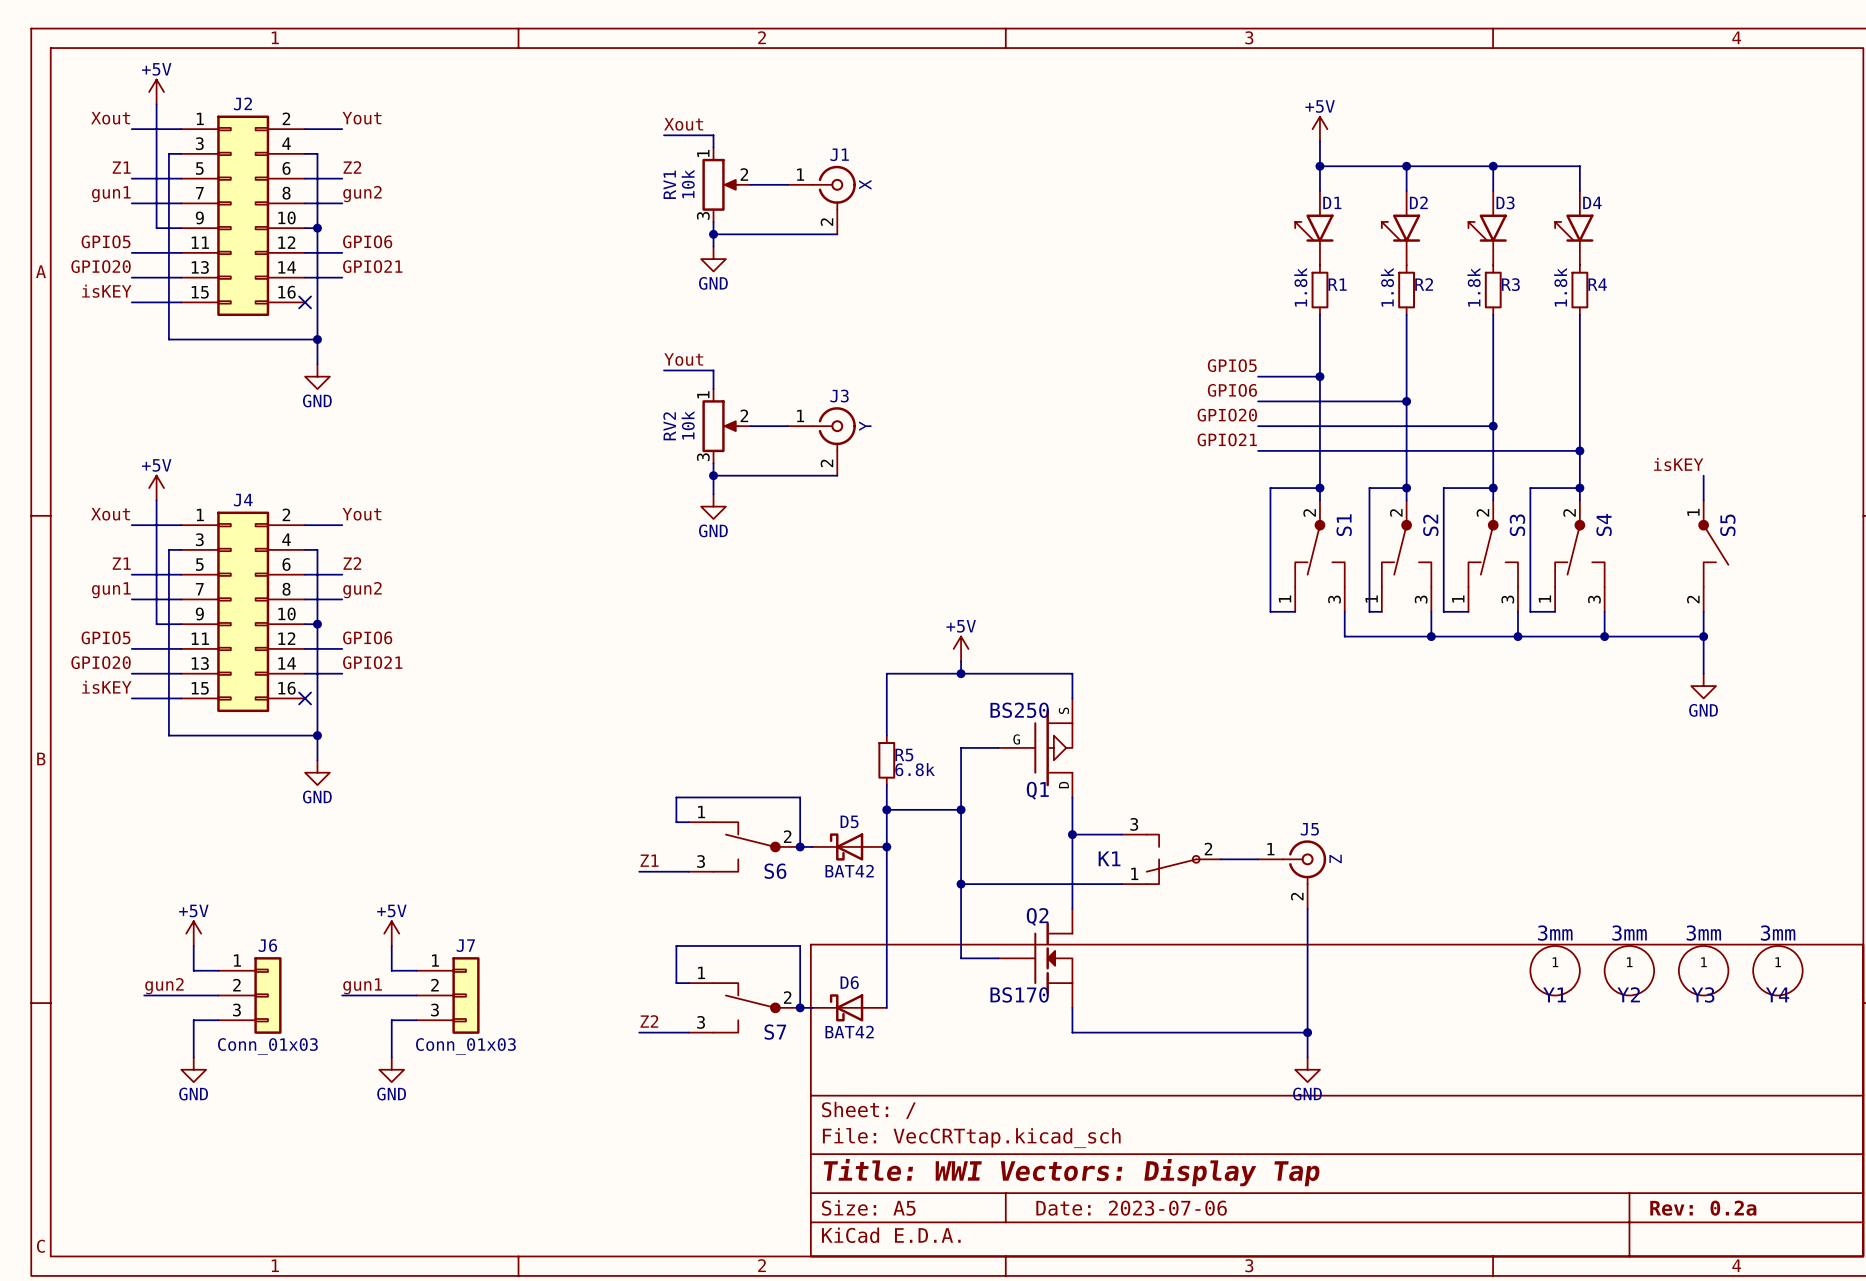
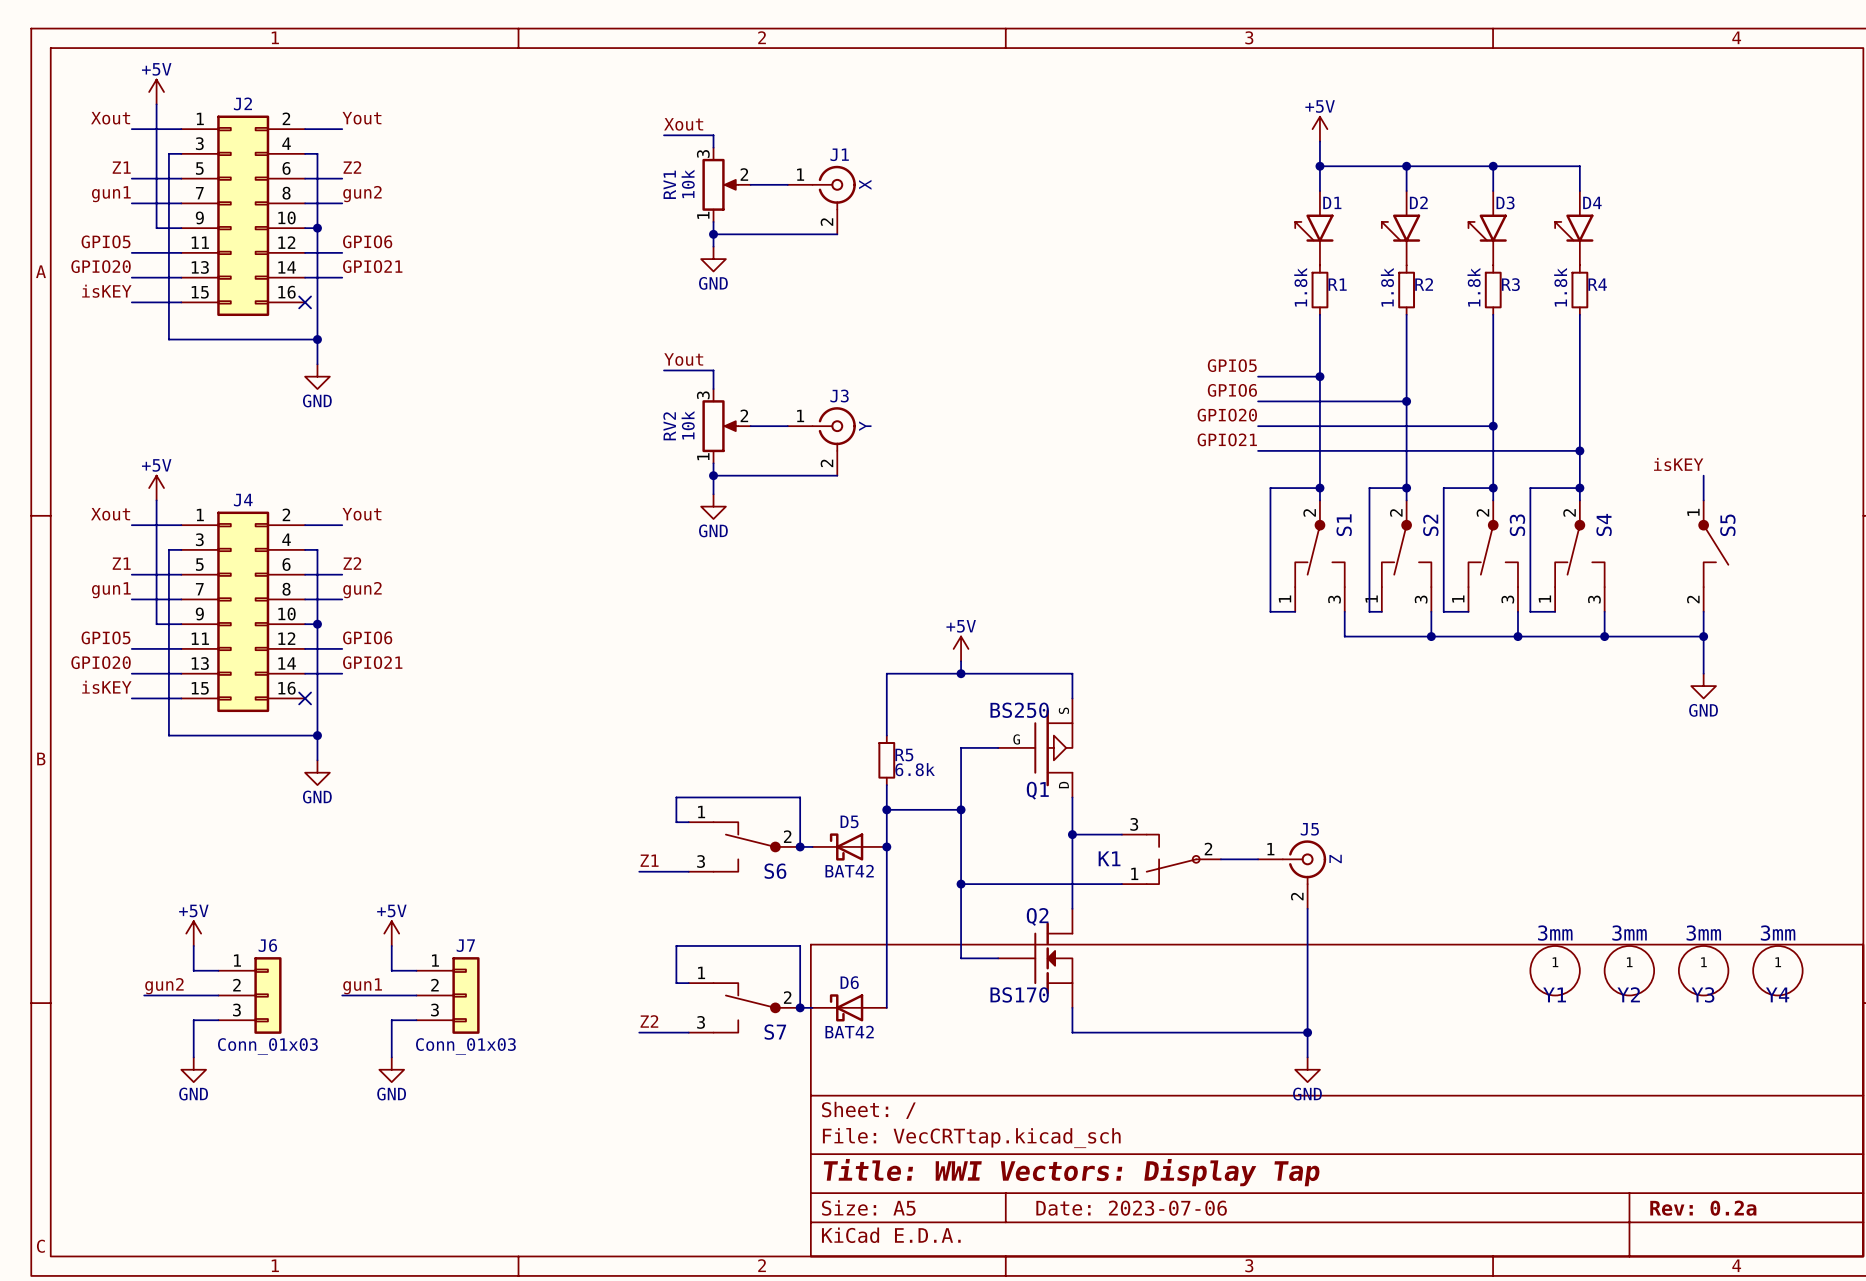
RV1 flip: as is (720, 184) -> up-down (720, 184)
RV2 flip: as is (720, 426) -> up-down (720, 426)

